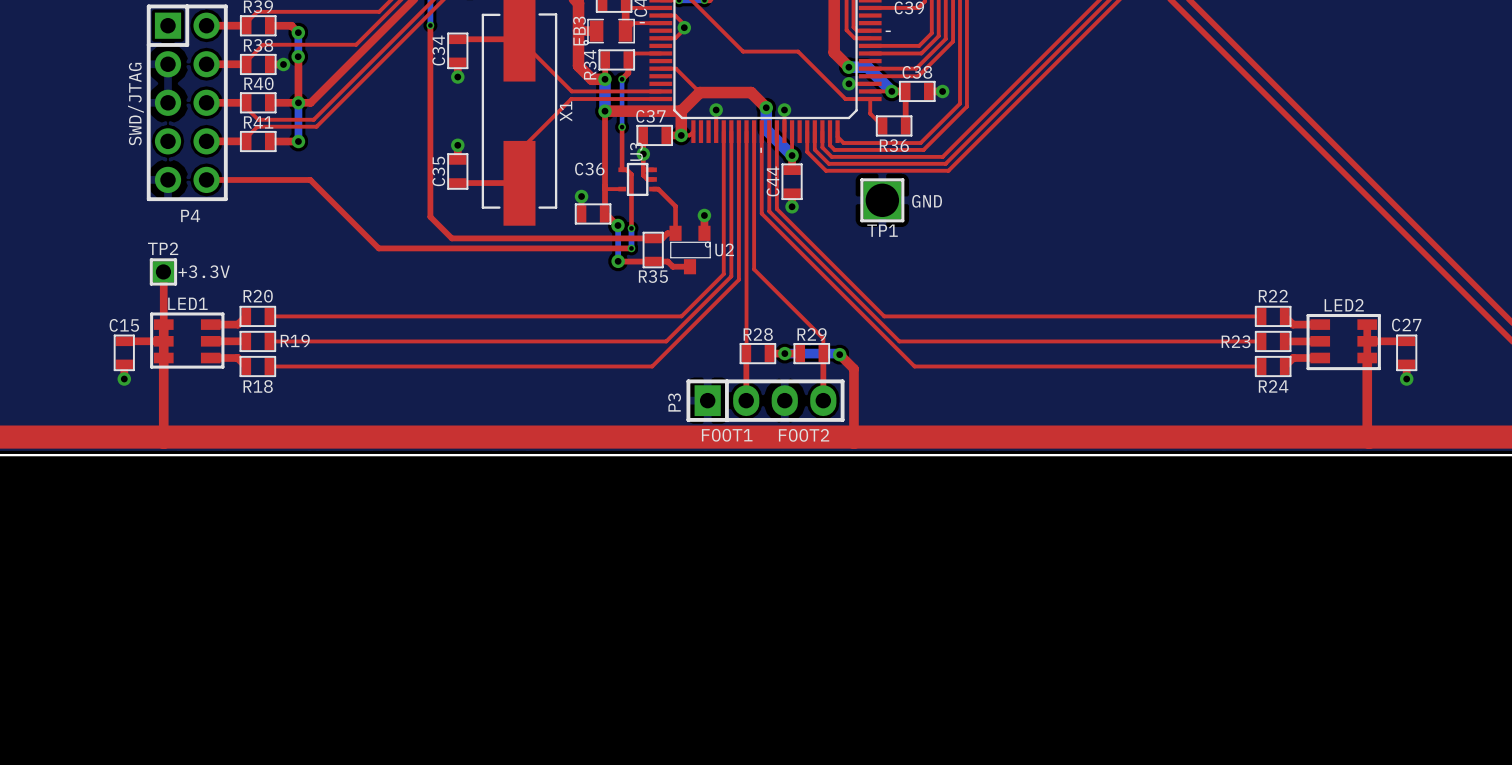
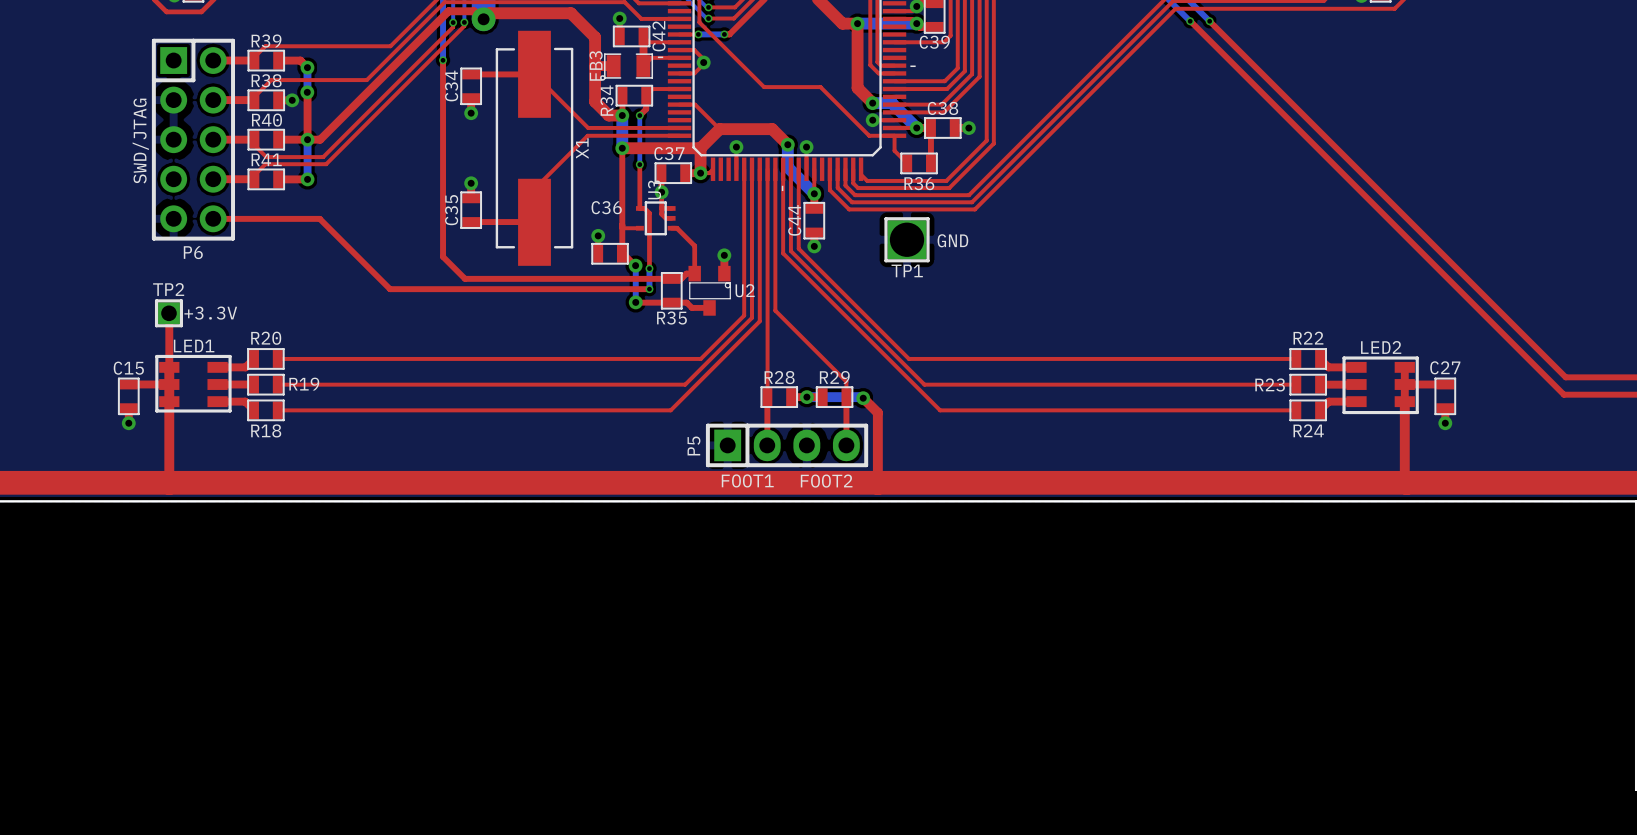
P4 name: P4 (190, 215) -> P6 (193, 252)
P3 name: P3 (674, 402) -> P5 (693, 445)

